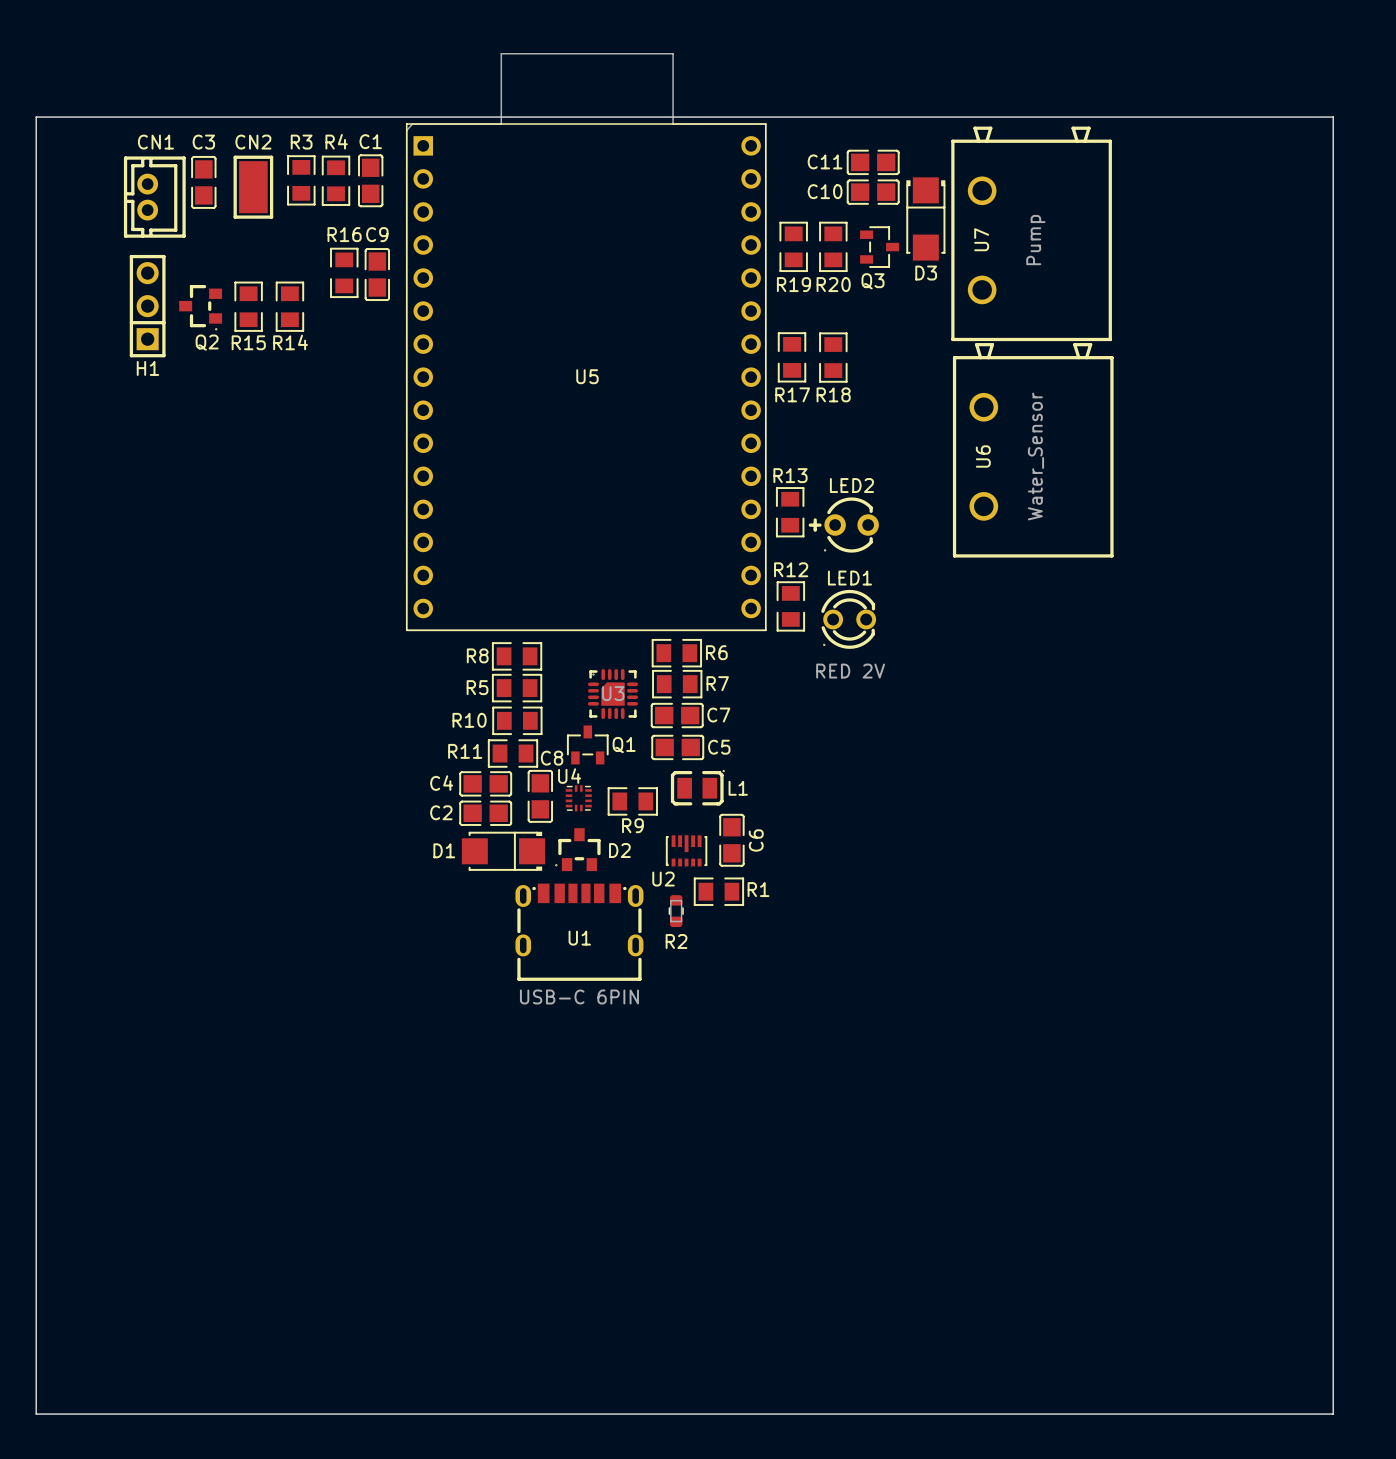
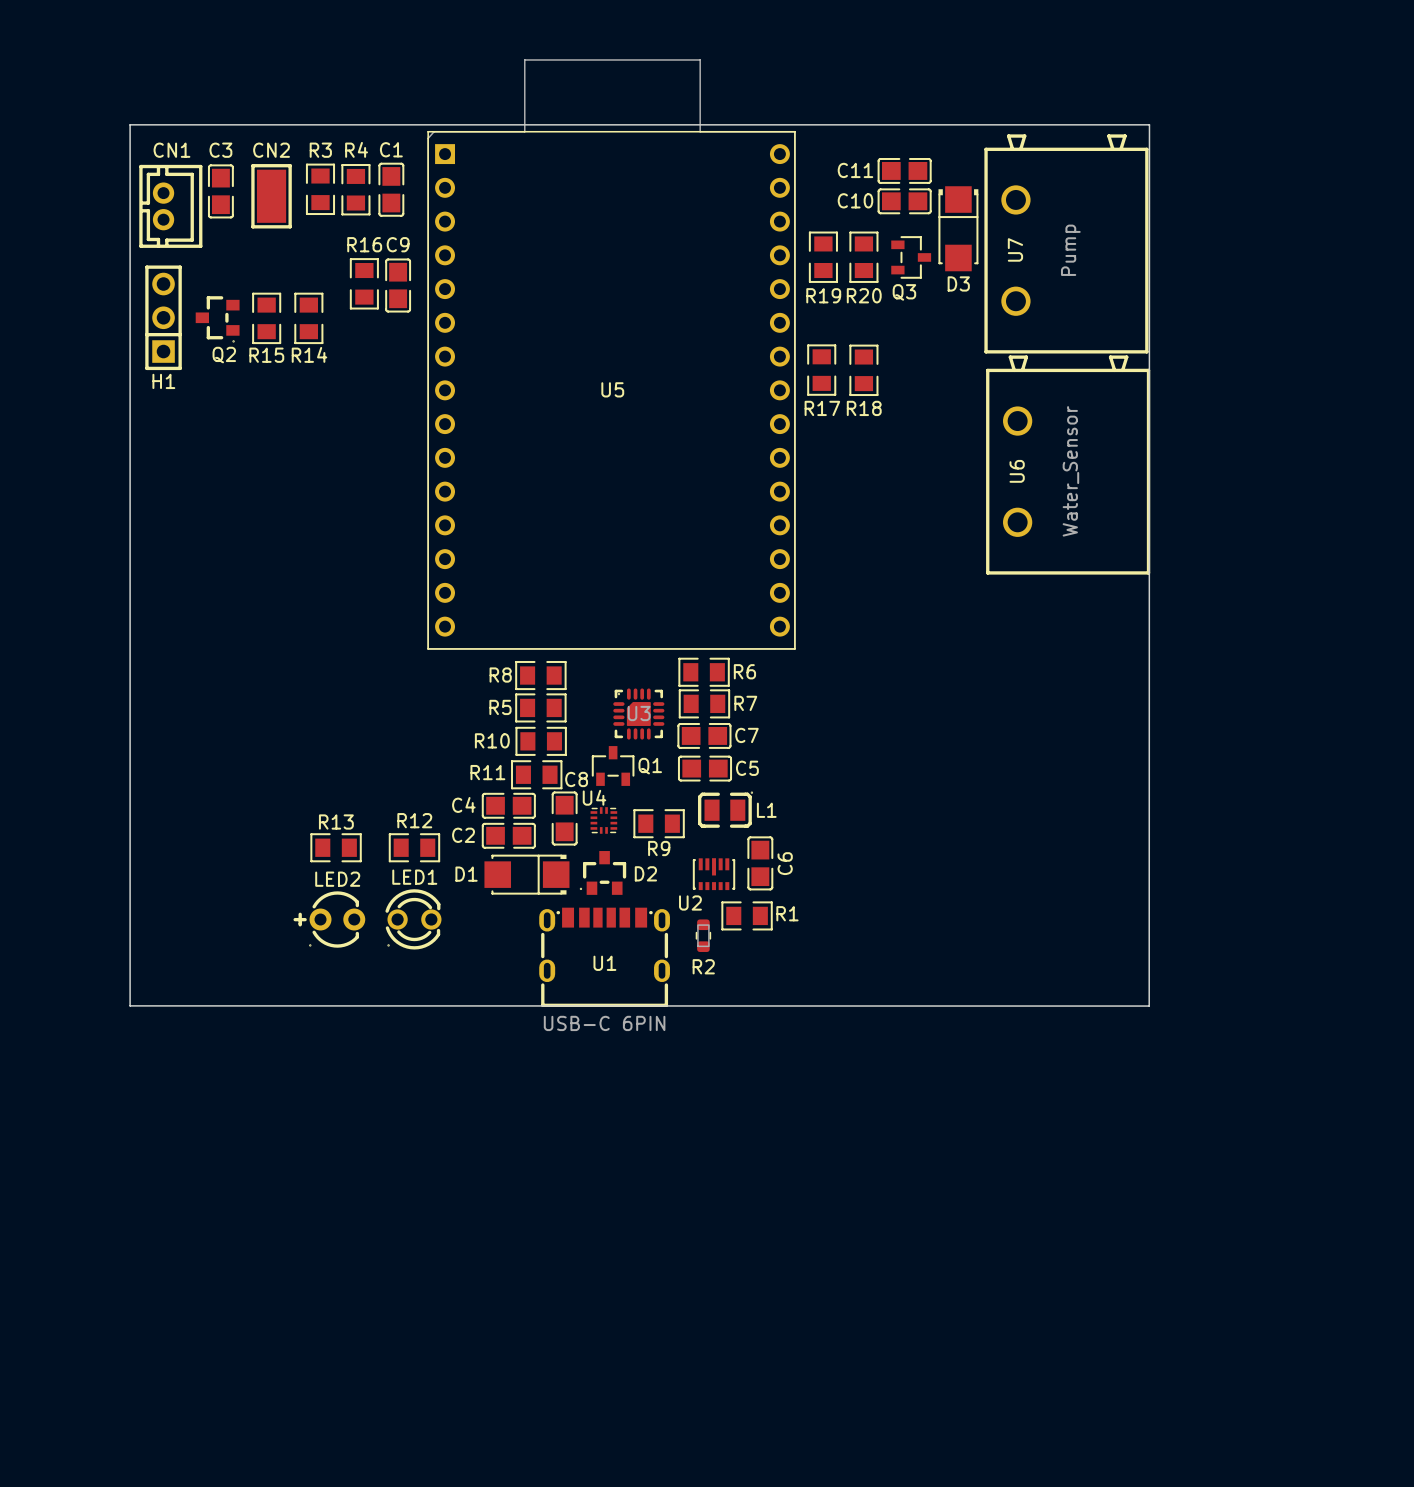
board edge: (36, 117) (36, 1414) (1333, 1414) (1333, 117) (36, 117) -> (1149, 1006) (130, 1005) (130, 124) (1149, 124) (1149, 1005)
R13 rotation: 0° (790, 512) -> 90° clockwise (336, 847)
R13 position: (790, 512) -> (336, 847)
LED2 position: (843, 525) -> (329, 919)
R12 rotation: 0° (790, 606) -> 90° clockwise (414, 847)
R12 position: (790, 606) -> (414, 847)
LED1 position: (848, 619) -> (413, 919)
LED1 value: RED 2V (850, 671) -> none

